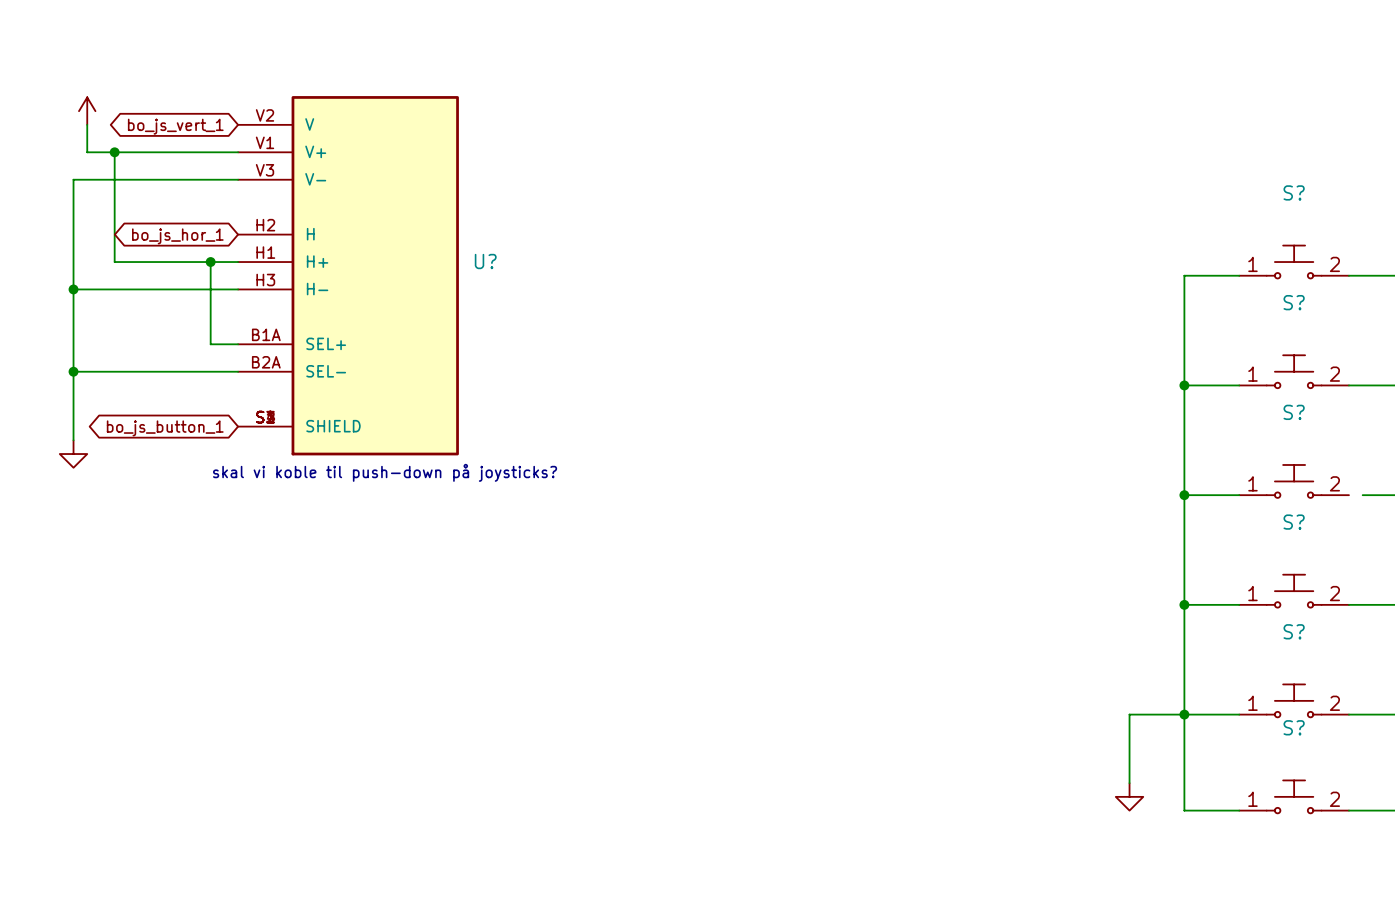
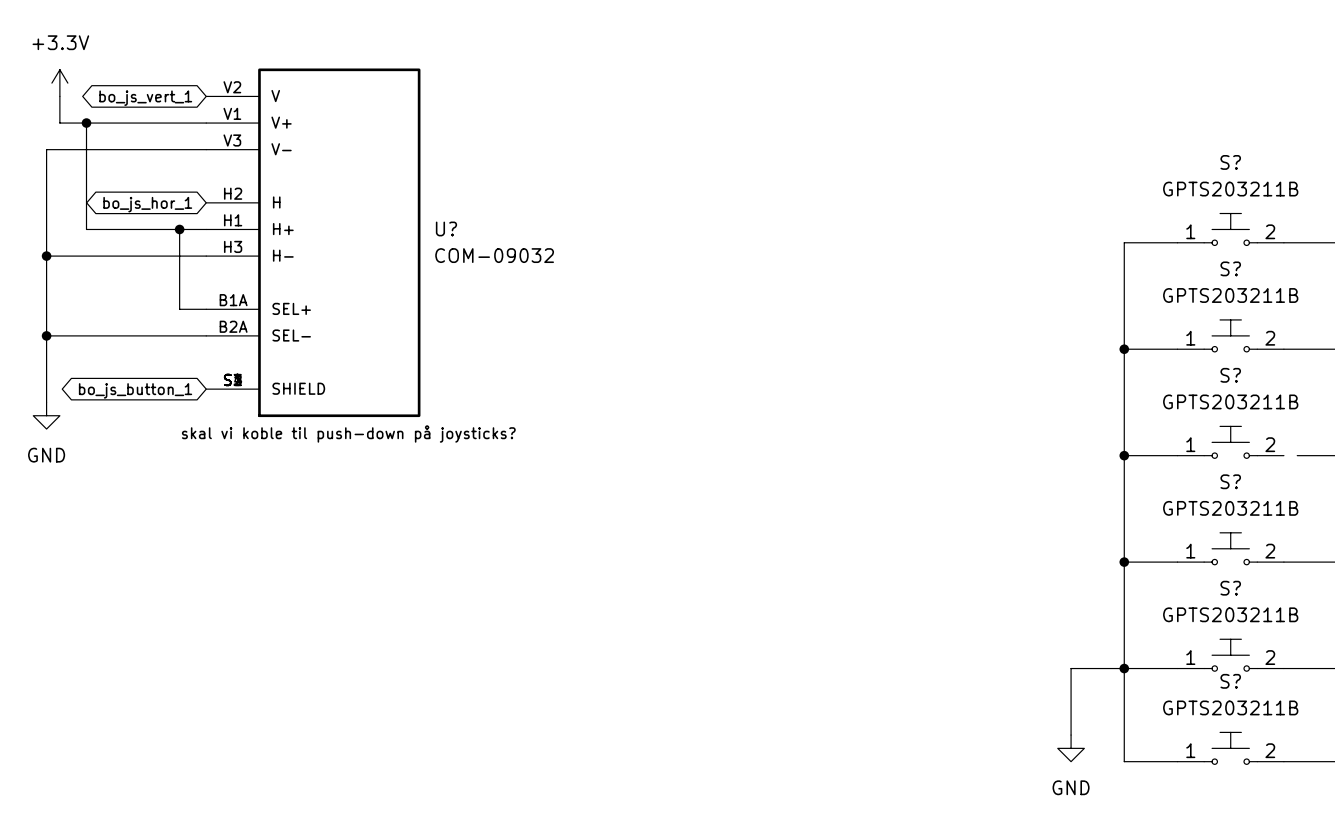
power symbol text: none -> +3.3V (60, 42)
S? value: none -> GPTS203211B (1230, 189)
U? value: none -> COM-09032 (494, 255)
S? value: none -> GPTS203211B (1230, 295)
S? value: none -> GPTS203211B (1230, 401)
power symbol text: none -> GND (46, 455)
S? value: none -> GPTS203211B (1230, 508)
S? value: none -> GPTS203211B (1230, 614)
S? value: none -> GPTS203211B (1230, 707)
power symbol text: none -> GND (1071, 787)

